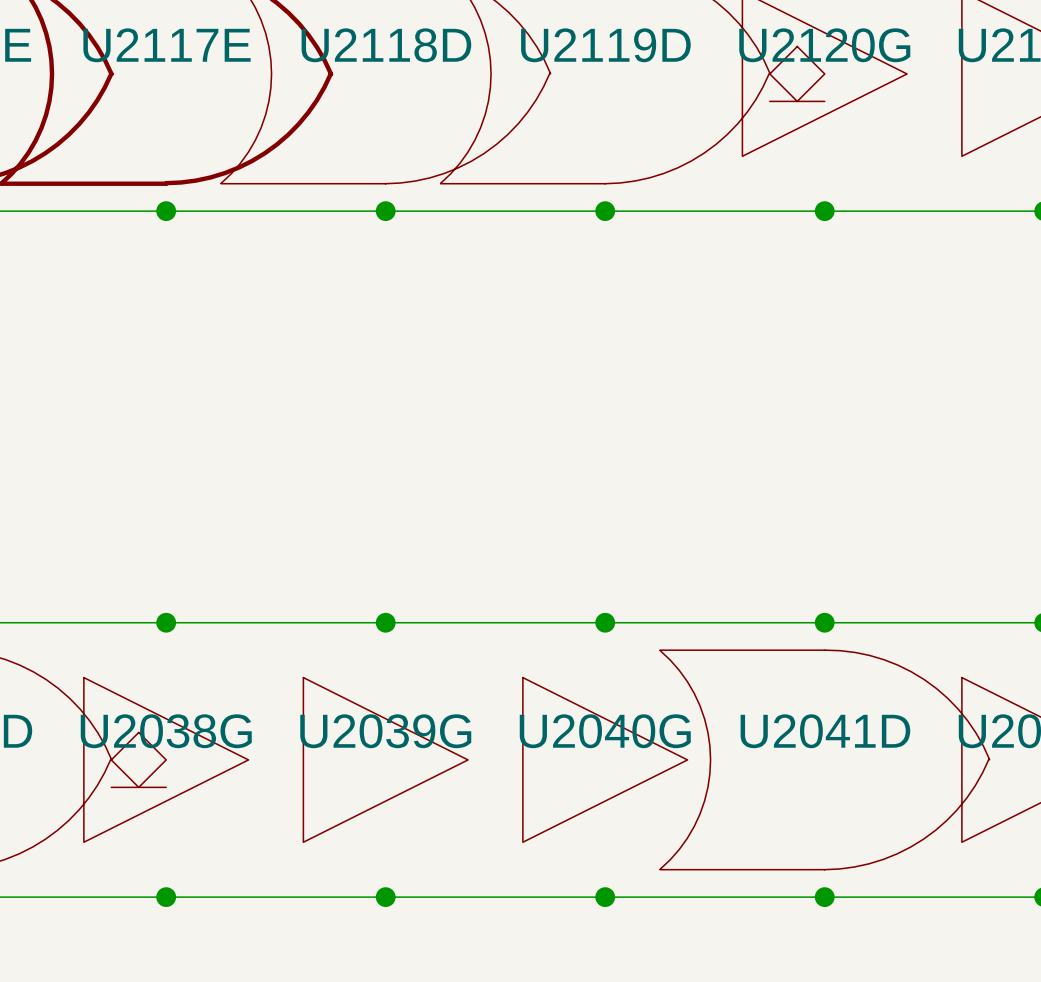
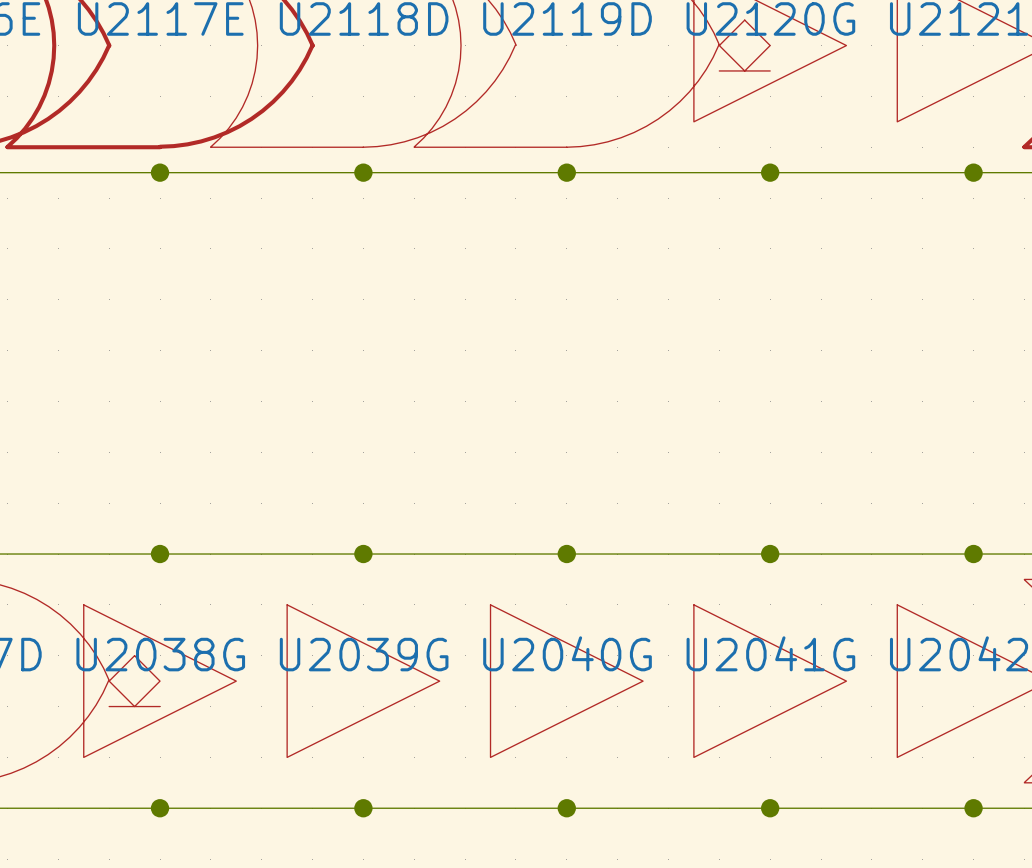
U2041D: (824, 759) -> none
U2041G: none -> (770, 681)

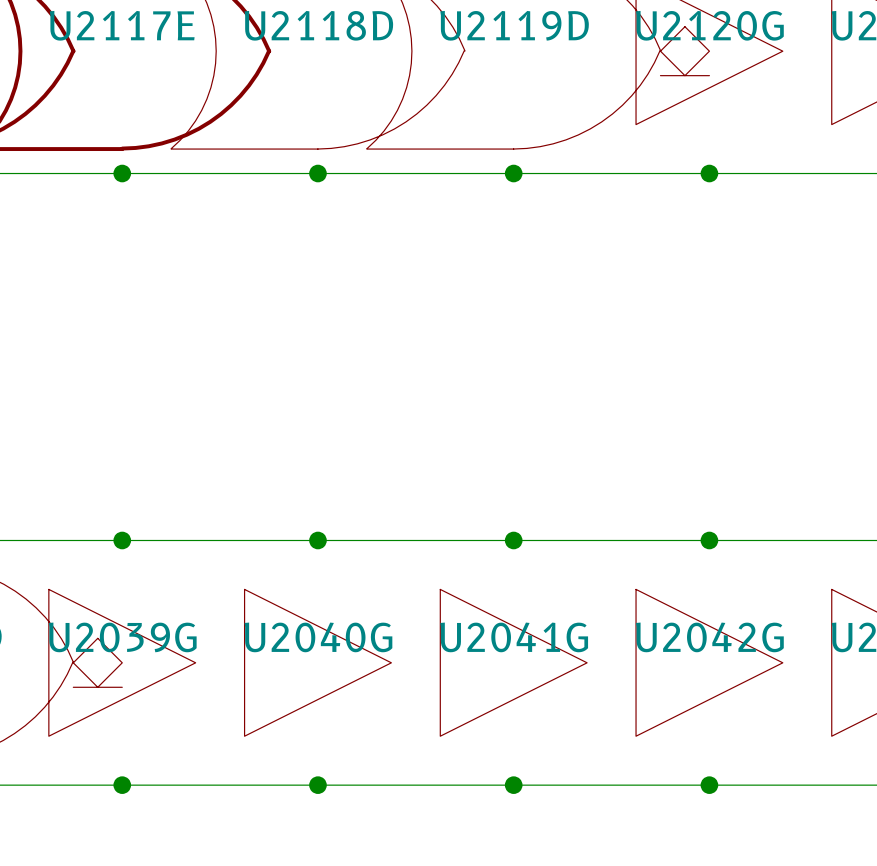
U2040G name: U2040G (567, 653) -> U2041G (514, 637)
U2041G name: U2041G (770, 653) -> U2042G (709, 637)
U2038G name: U2038G (160, 654) -> U2039G (122, 637)
U2039G name: U2039G (364, 654) -> U2040G (318, 637)

